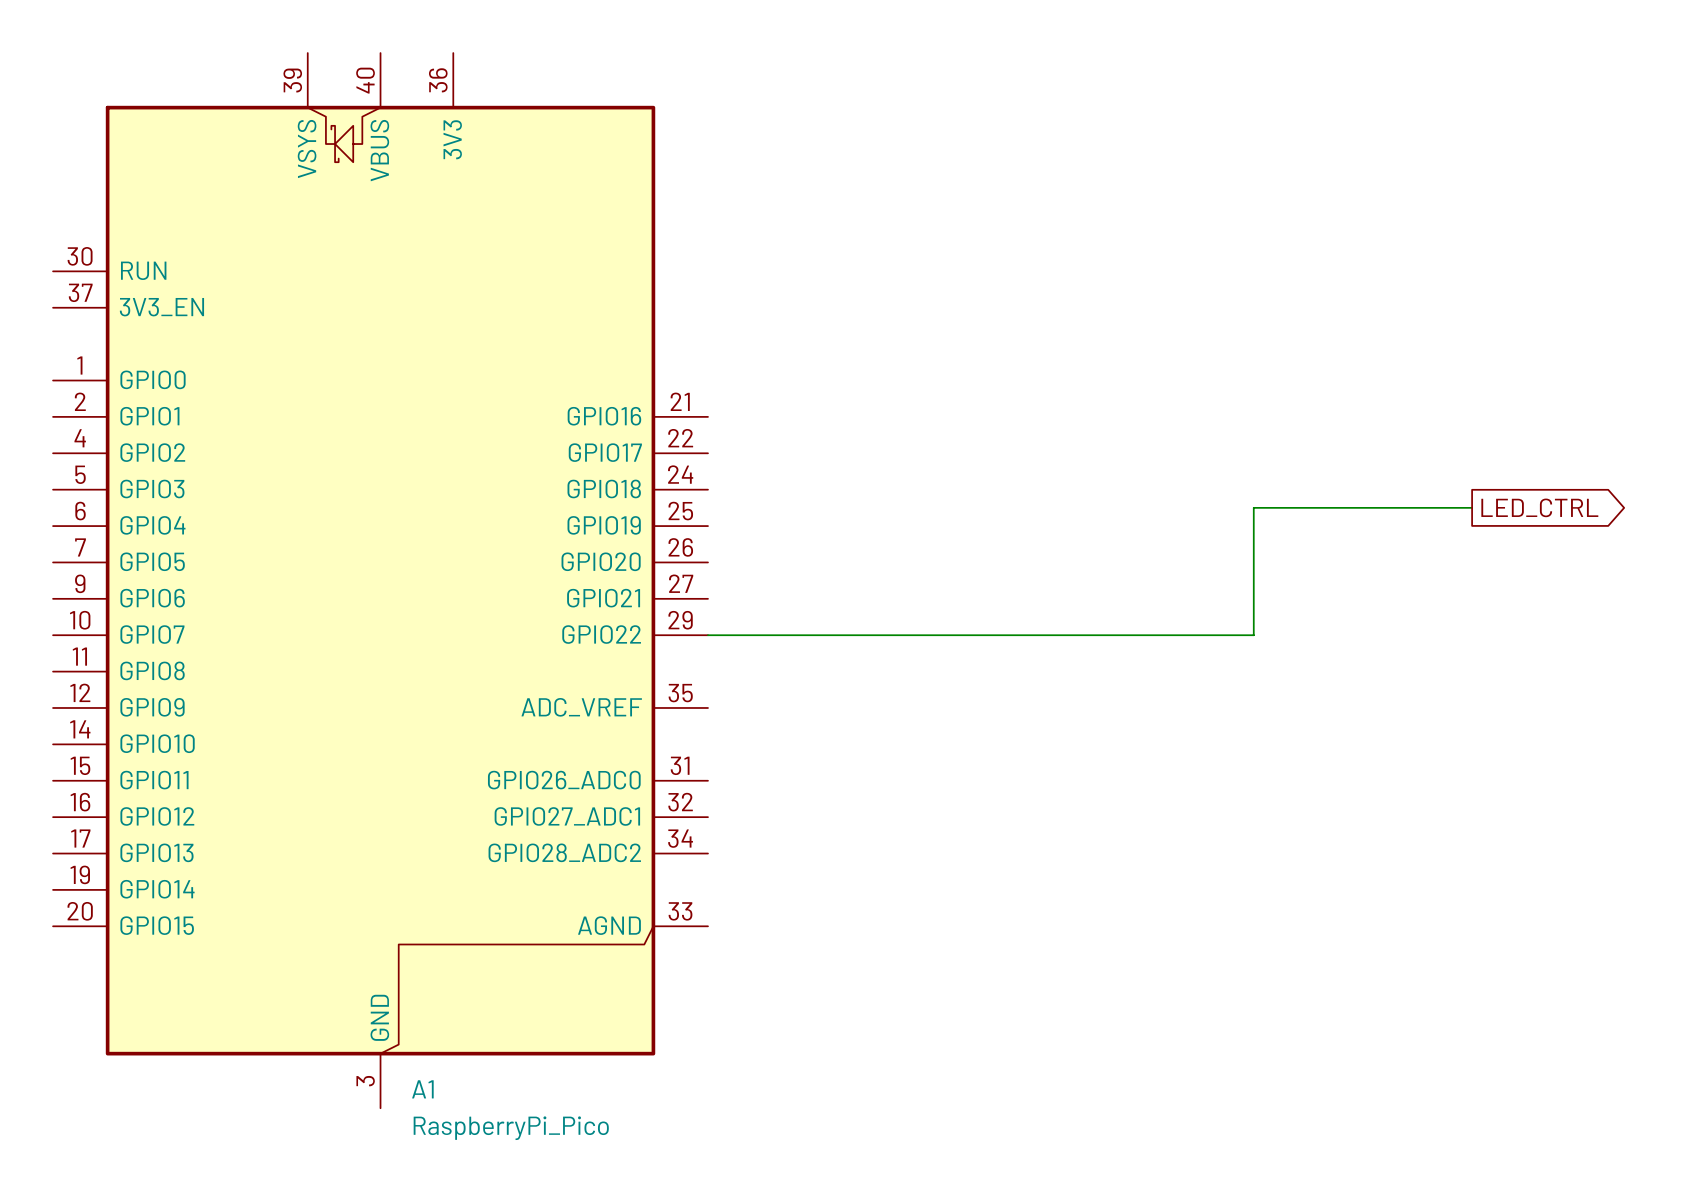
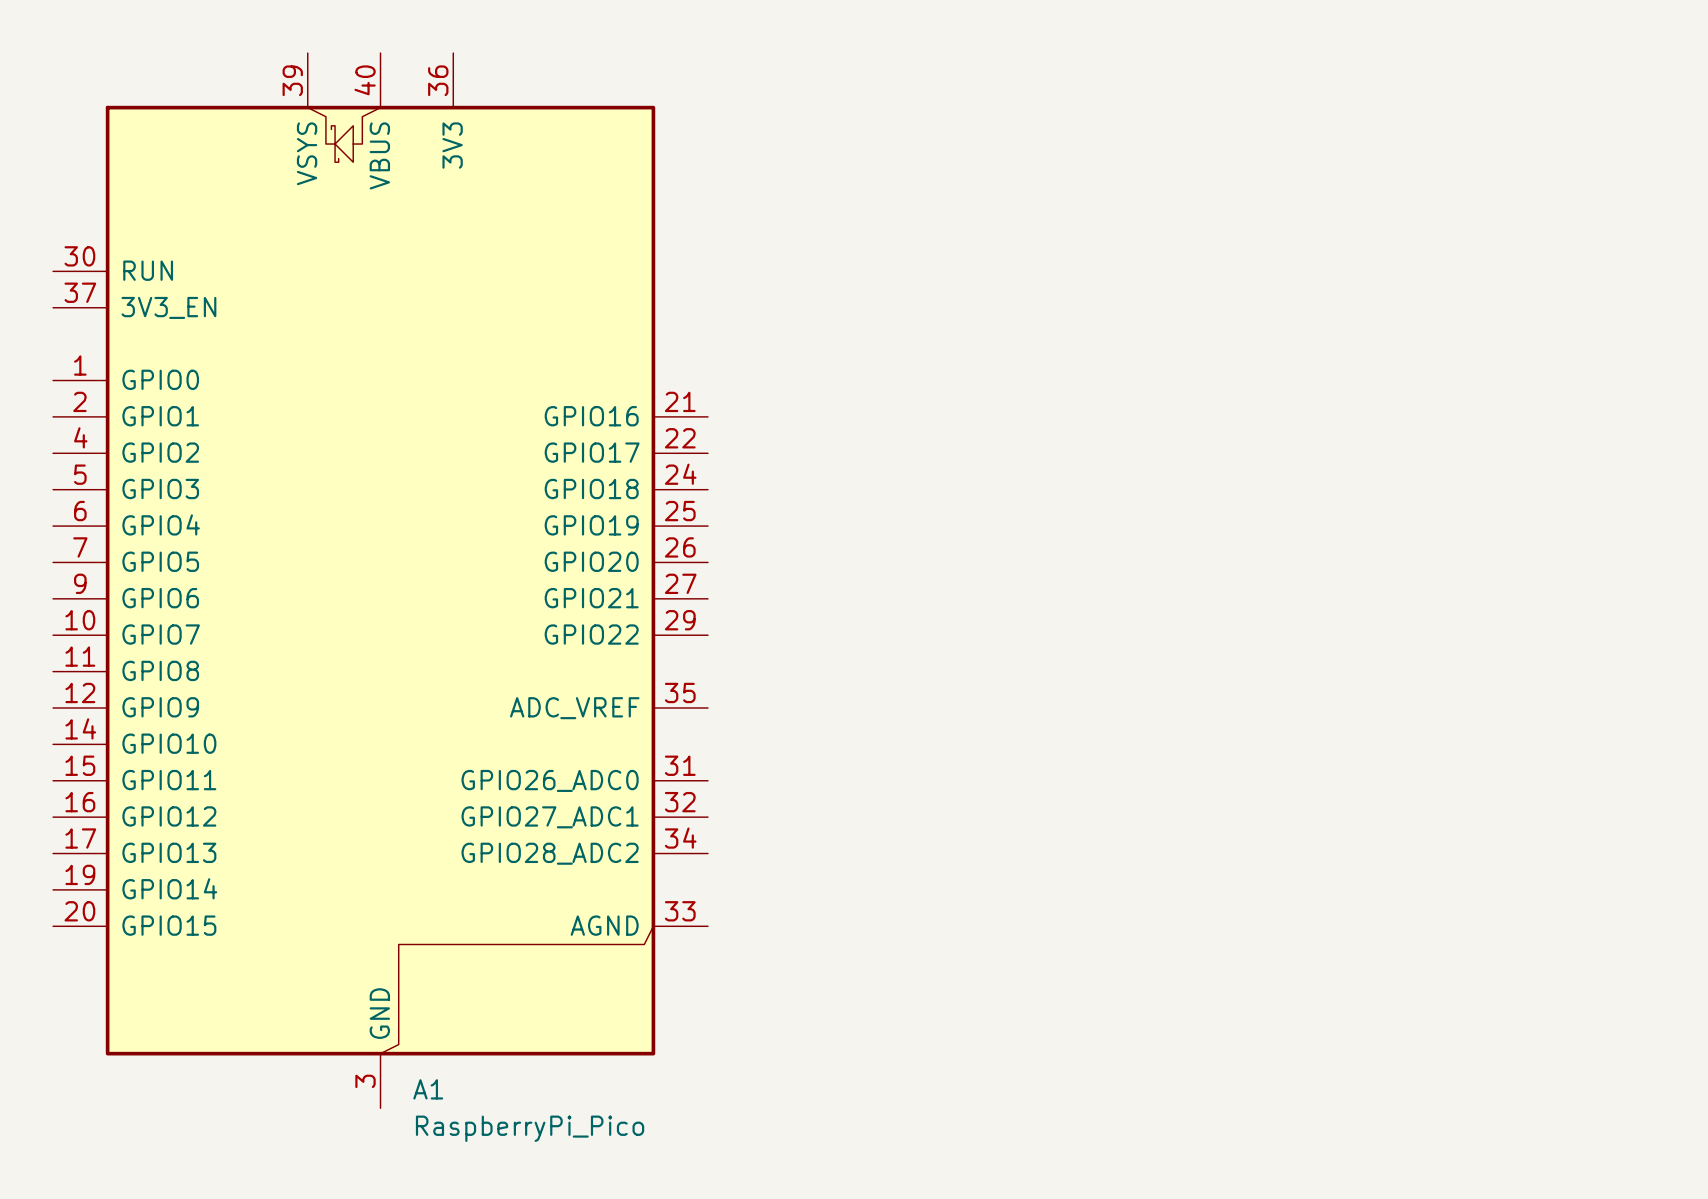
wire: (1472, 507) (1253, 507) (1253, 635) (707, 635) -> none
global label: LED_CTRL (1539, 507) -> none

